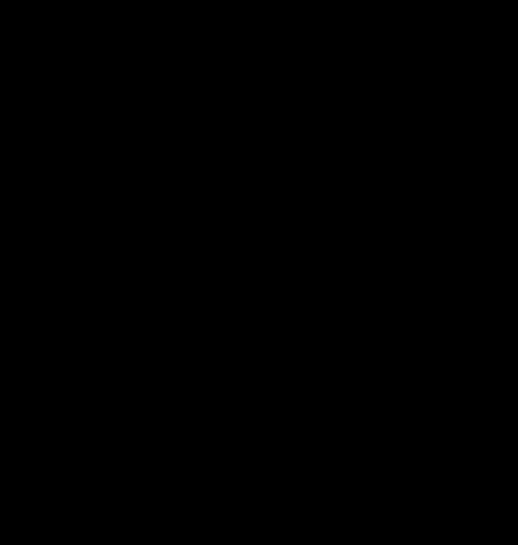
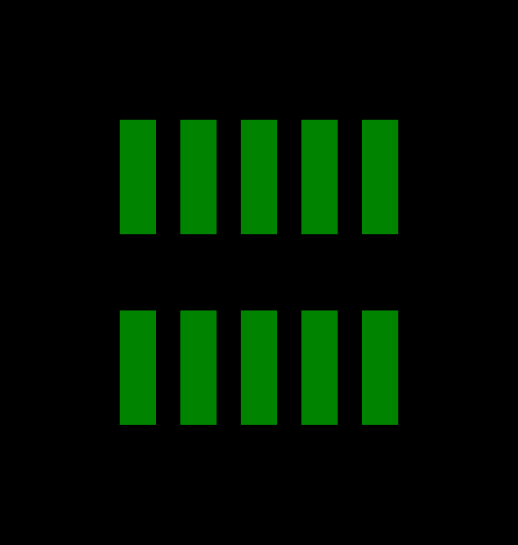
part: none -> (258, 272)

